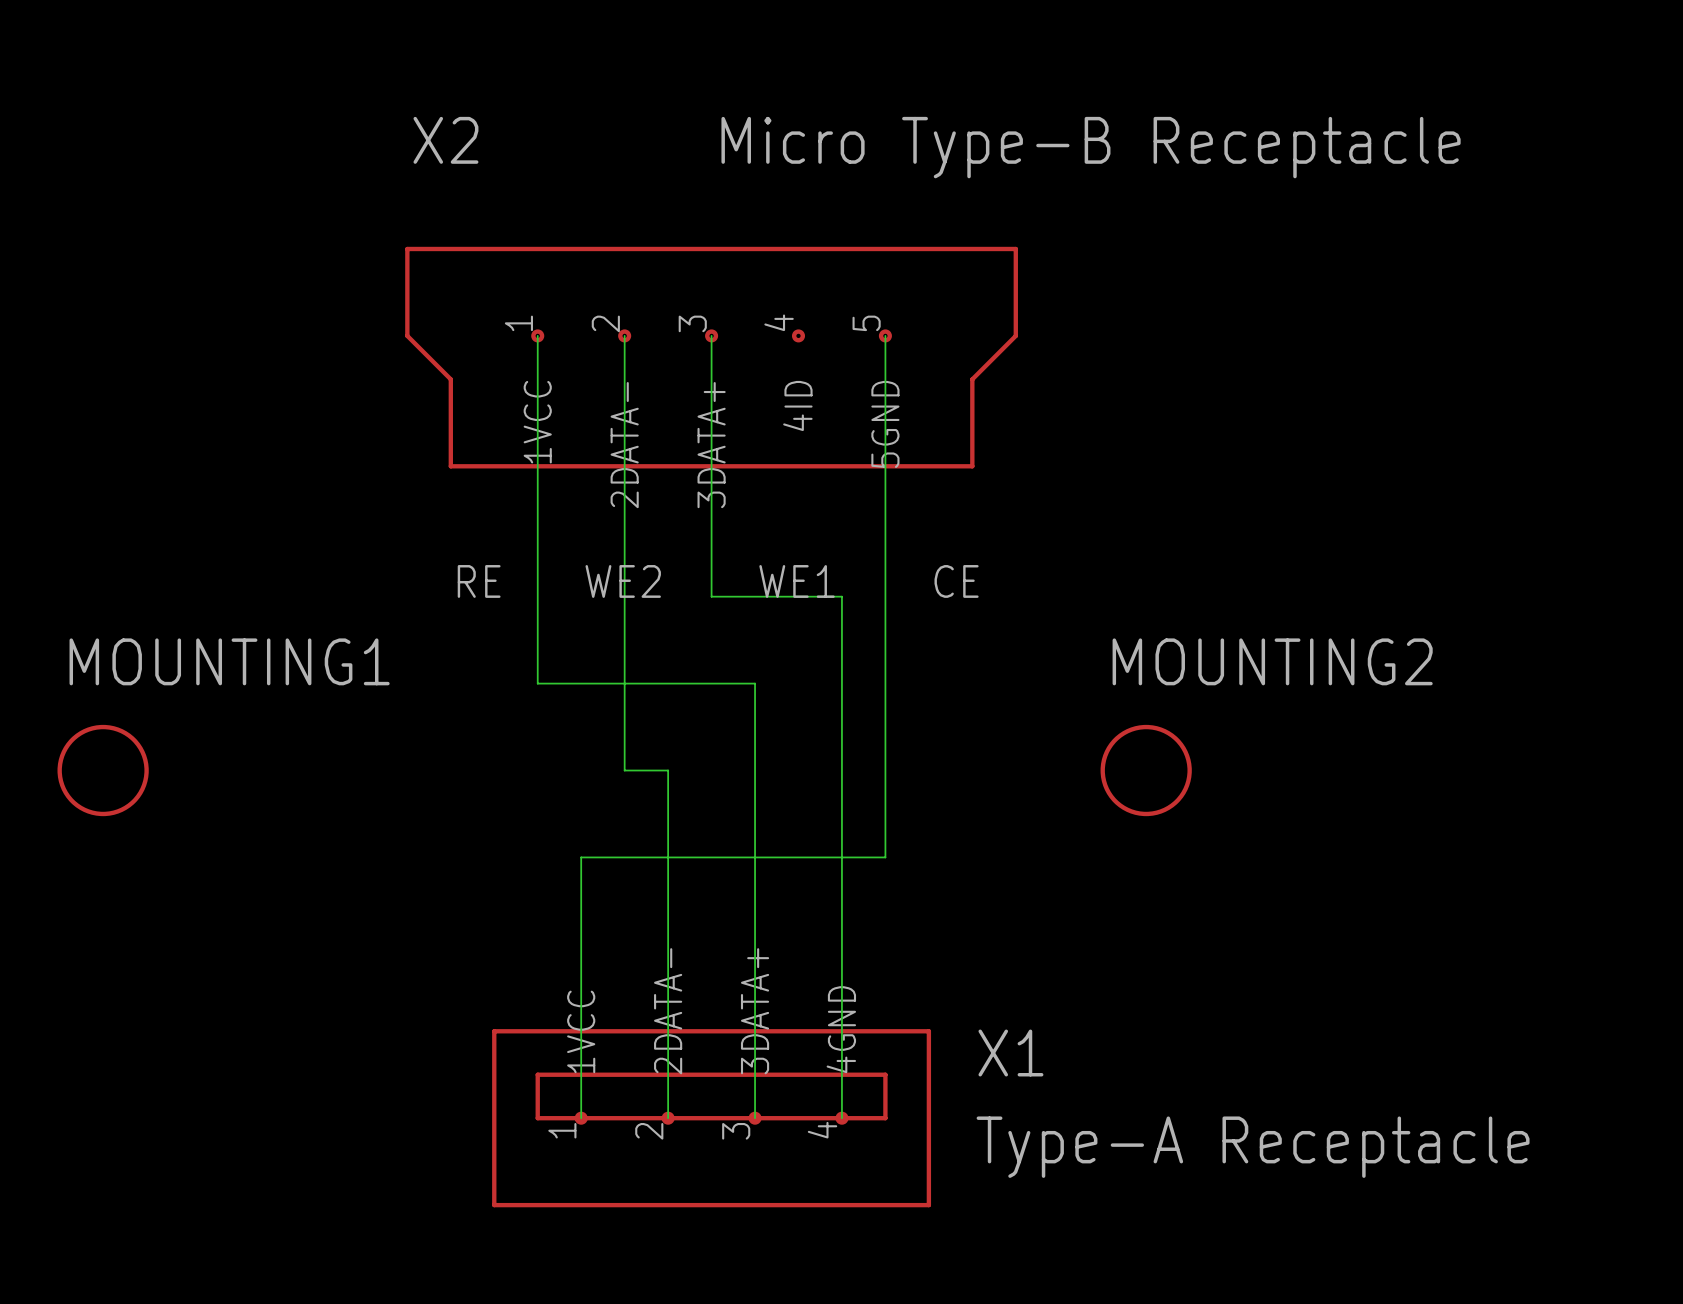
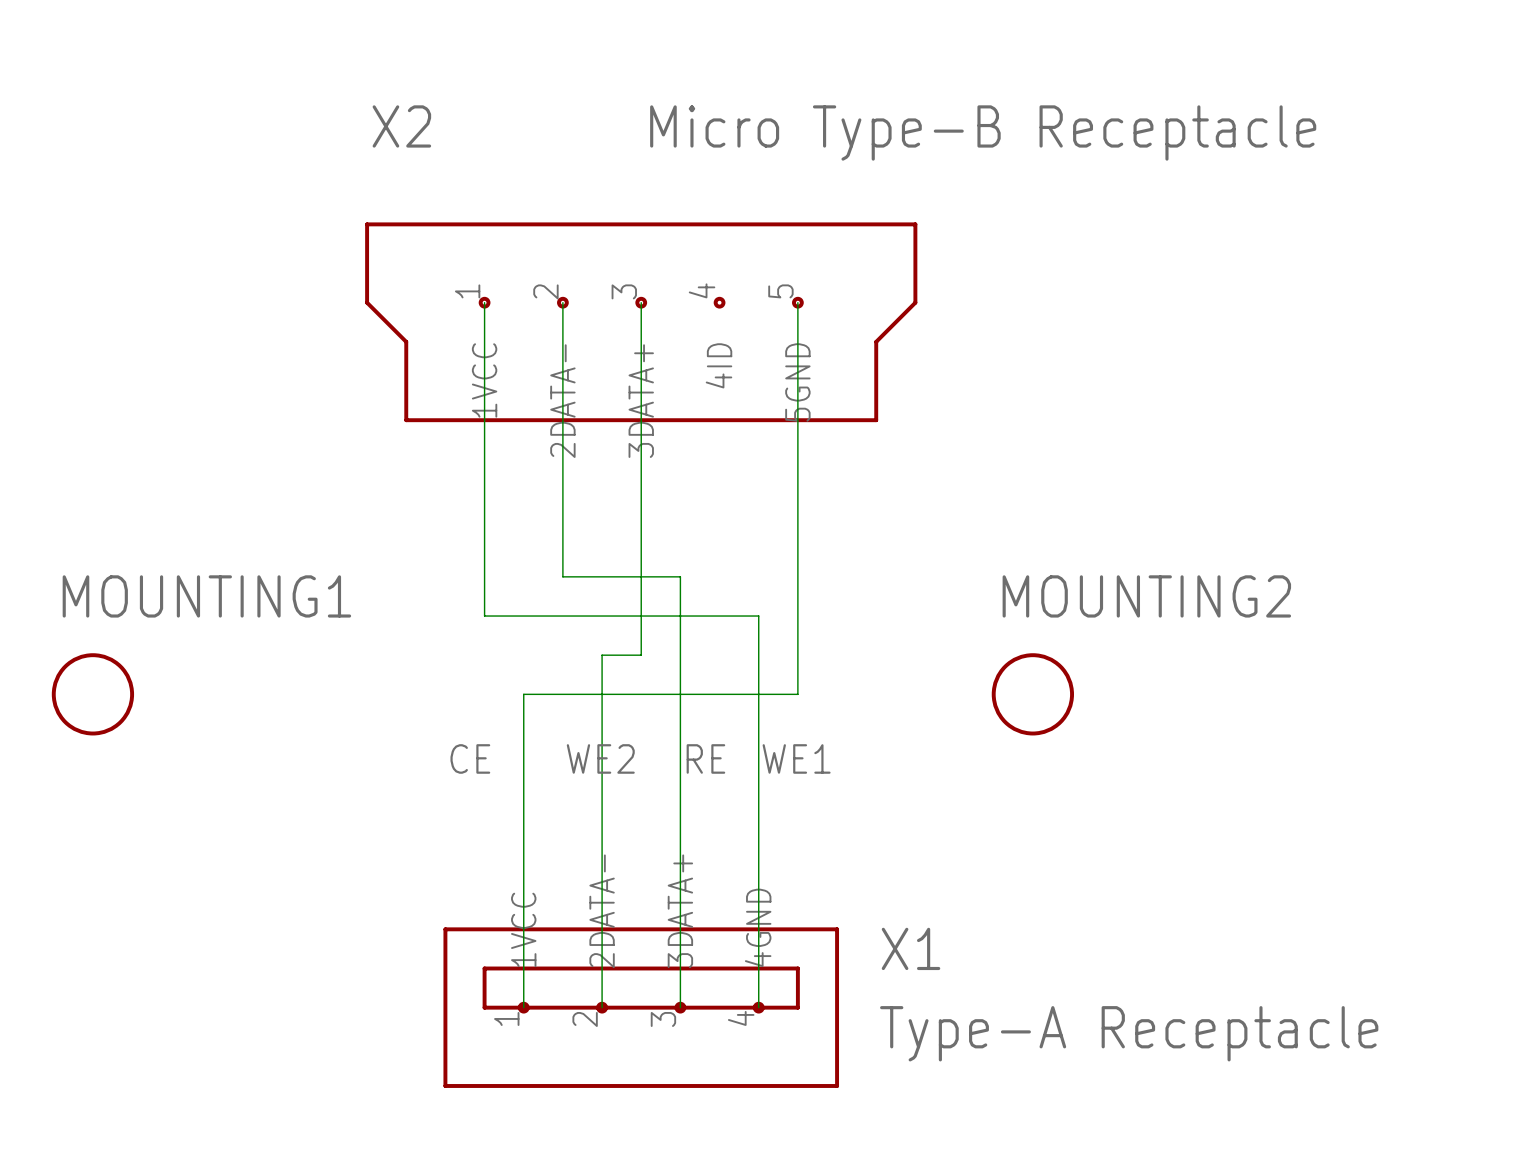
label position: RE (479, 581) -> RE (705, 758)
label position: WE2 (623, 581) -> WE2 (600, 758)
label position: WE1 (797, 581) -> WE1 (796, 758)
label: CE (956, 581) -> none
wire: (711, 596) (841, 596) (841, 683) -> (641, 537) (641, 655) (602, 655) (602, 694) (797, 694)
wire: (624, 640) (624, 770) -> (523, 772) (523, 694) (562, 694)
wire: none -> (562, 576) (680, 576) (680, 616) (758, 616)
wire: (885, 770) (885, 857) (581, 857) -> none
label: none -> CE (470, 758)

